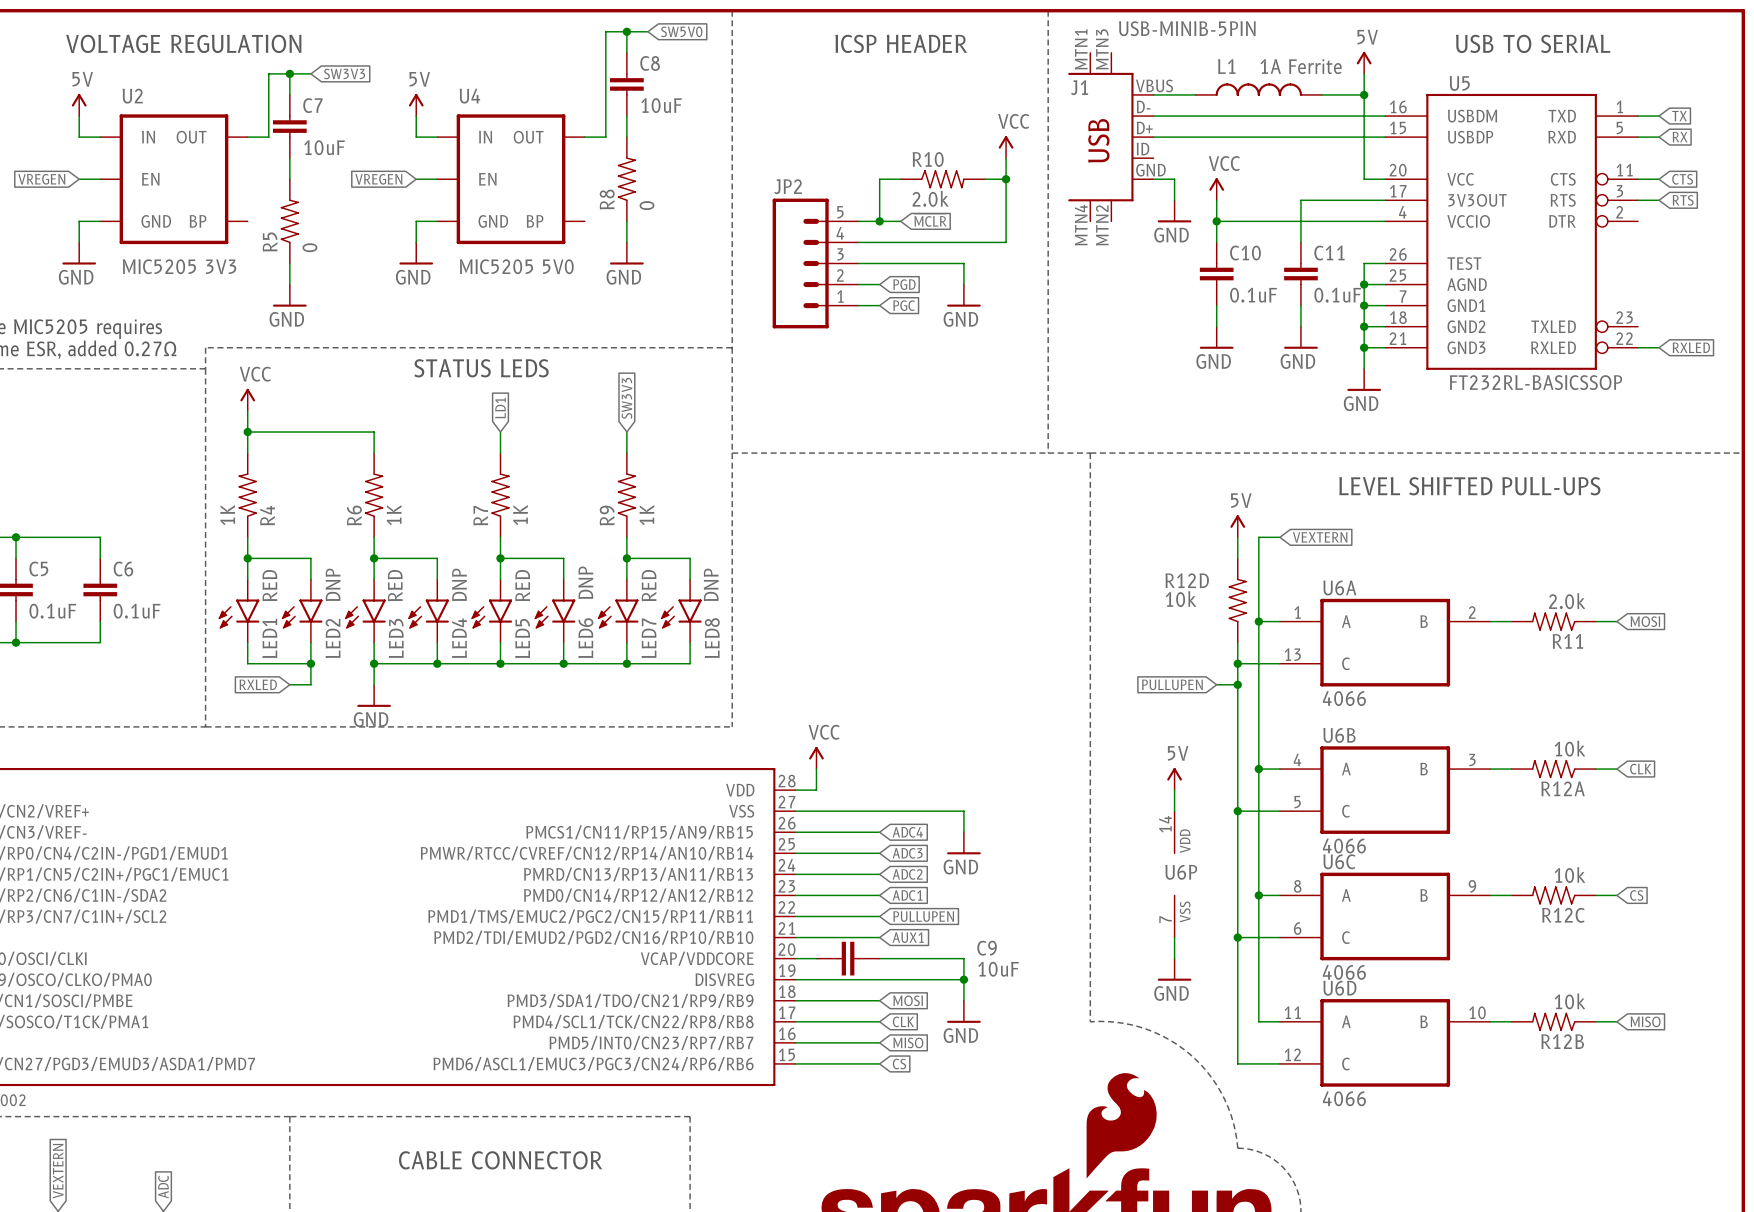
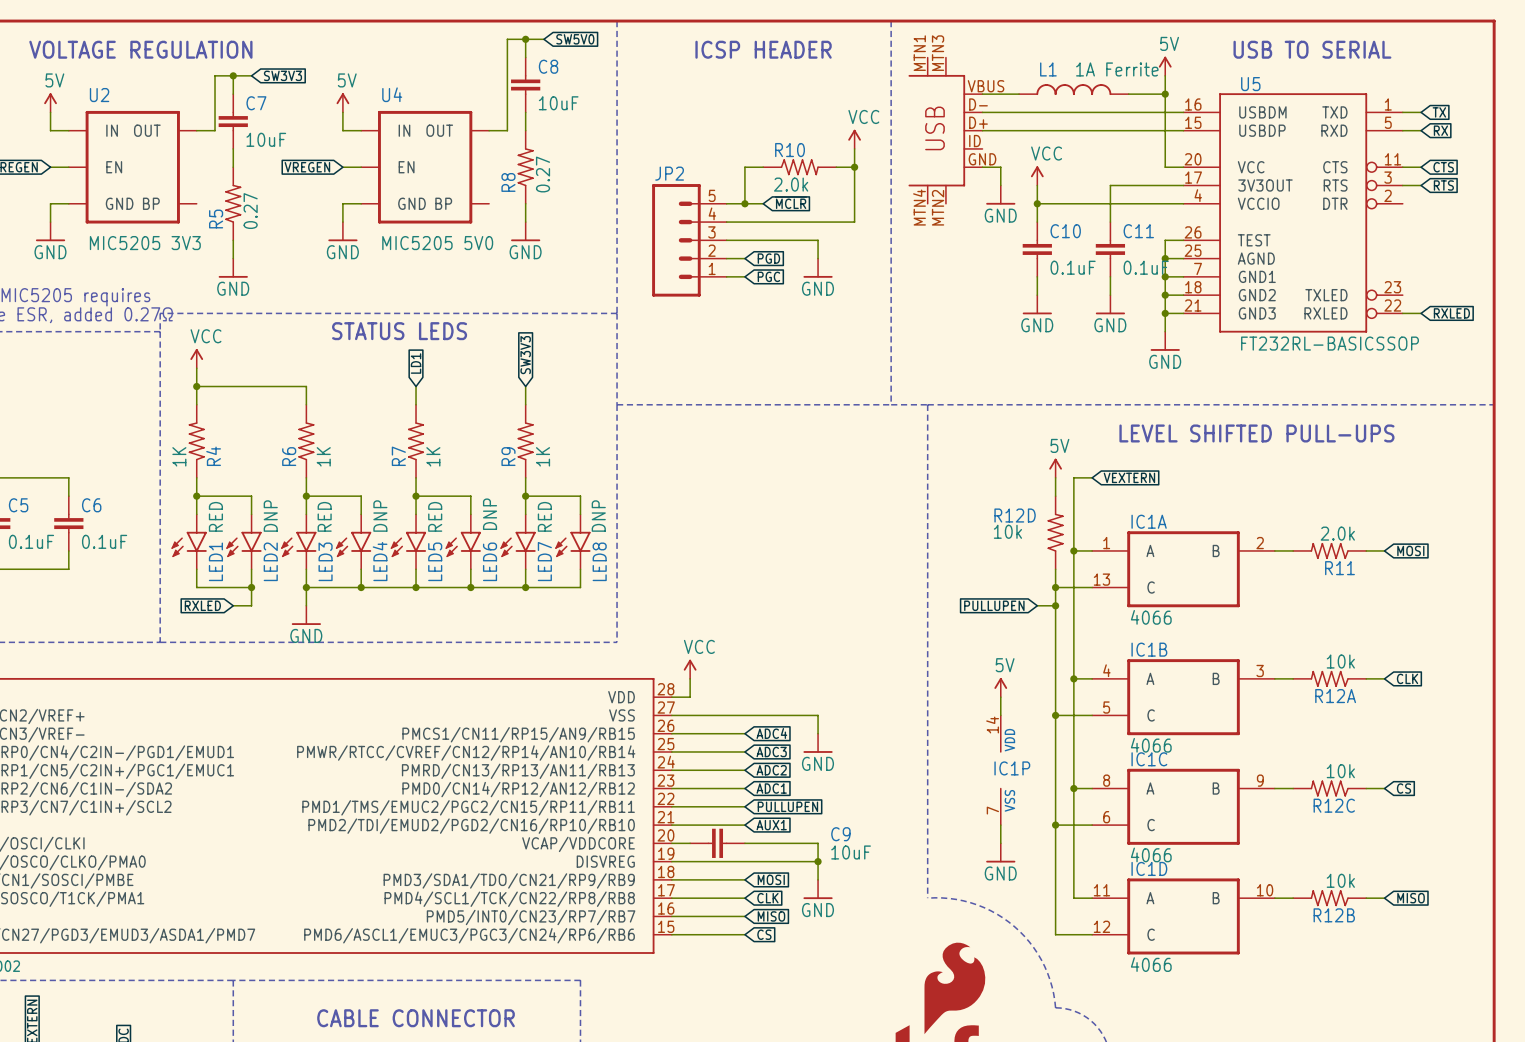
J1 value: USB-MINIB-5PIN (1187, 28) -> none
J1 name: J1 (1079, 87) -> none
R8 value: 0 (646, 205) -> 0.27 (543, 174)
R5 value: 0 (309, 247) -> 0.27 (250, 211)
U6A name: U6A (1339, 587) -> IC1A (1149, 521)
U6B name: U6B (1339, 735) -> IC1B (1149, 649)
U6C name: U6C (1339, 861) -> IC1C (1149, 759)
U6P name: U6P (1181, 872) -> IC1P (1012, 768)
U6D name: U6D (1339, 988) -> IC1D (1149, 868)

